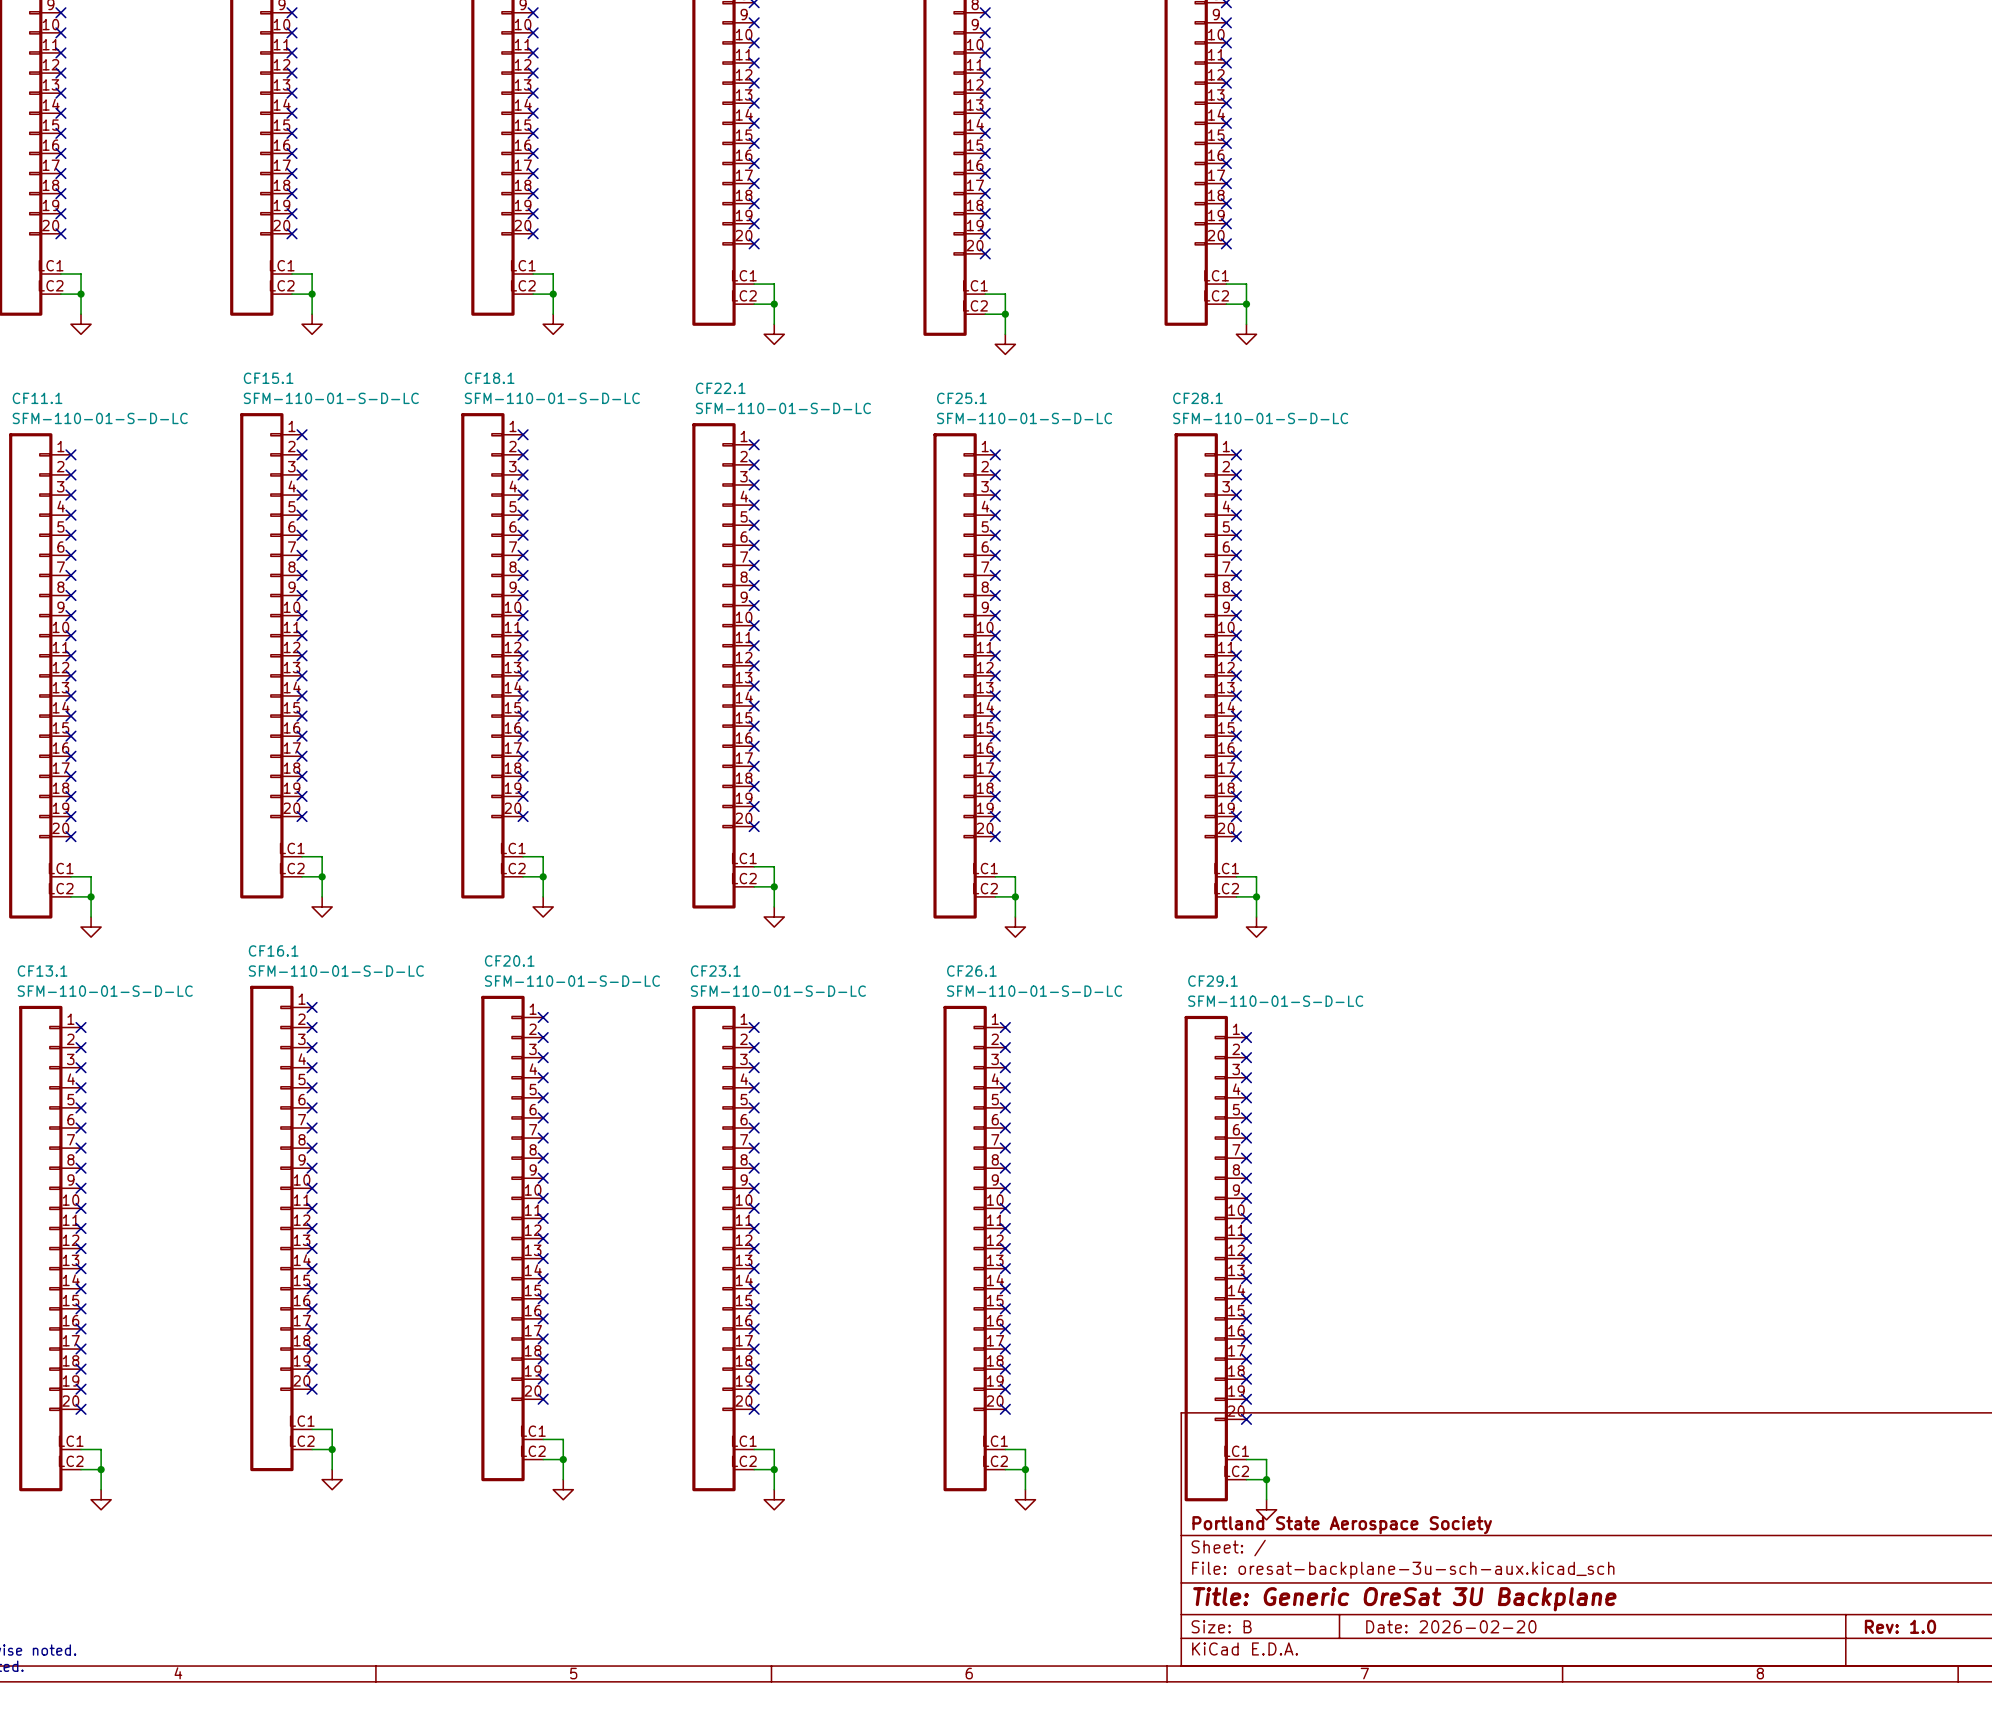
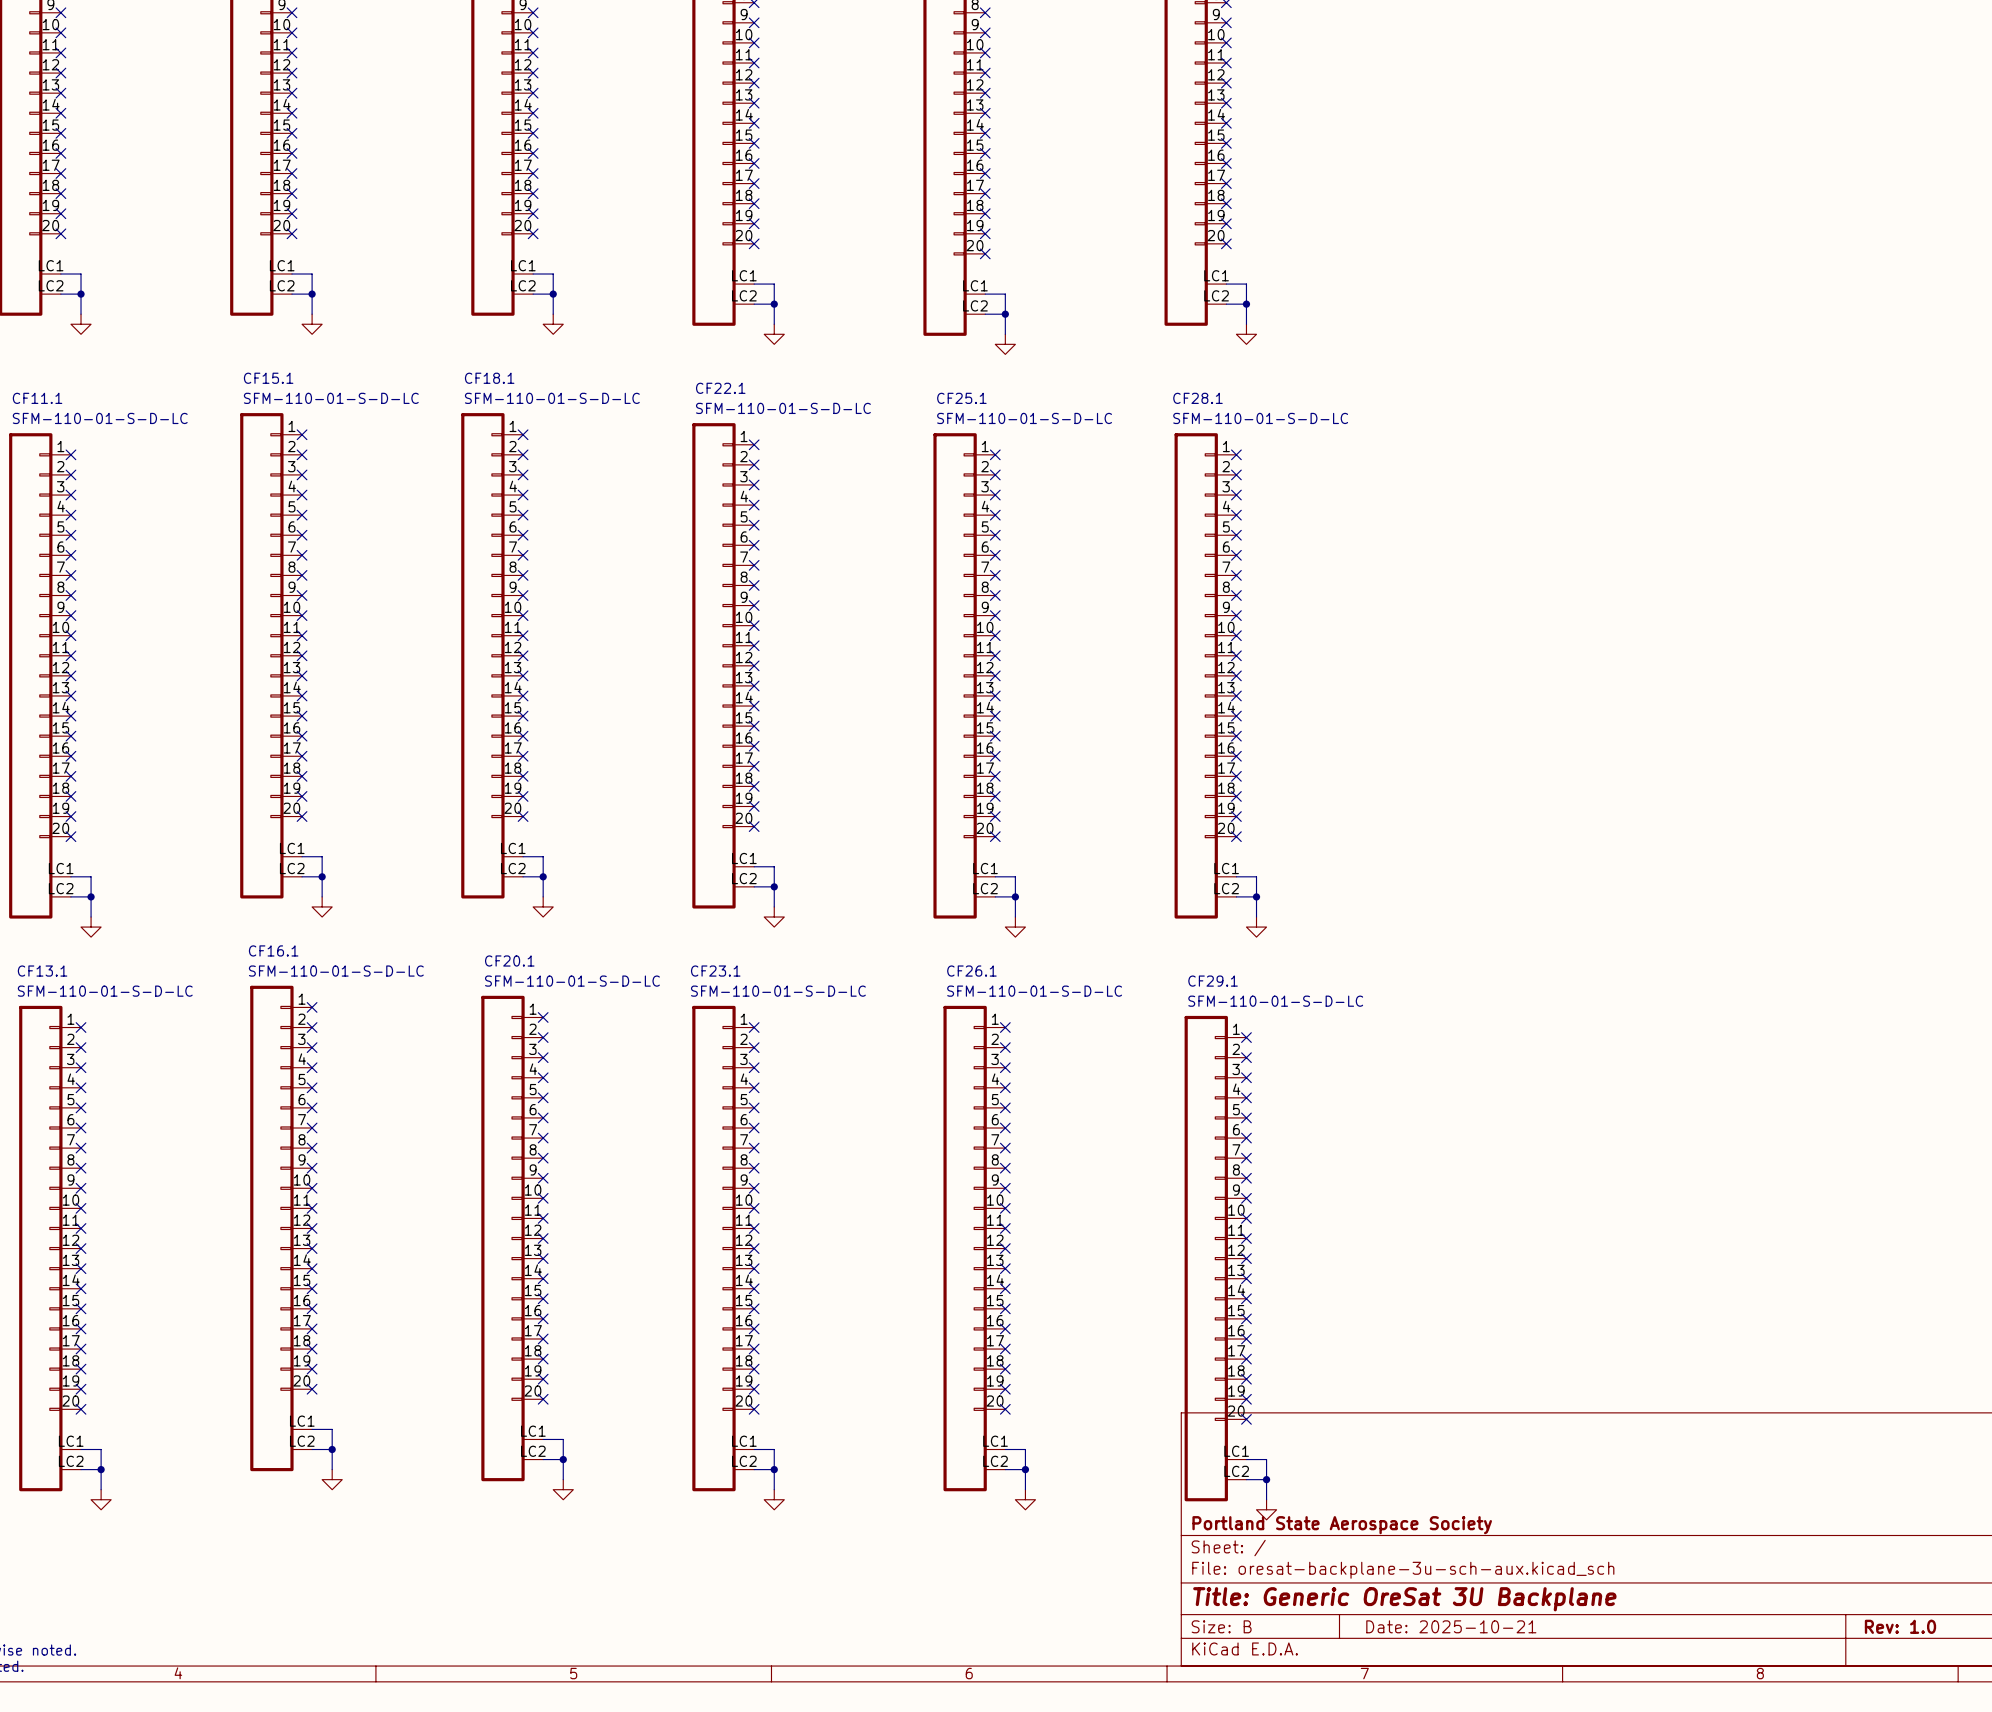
title block: Date: 2026-02-20 (1451, 1626) -> Date: 2025-10-21 (1451, 1626)

